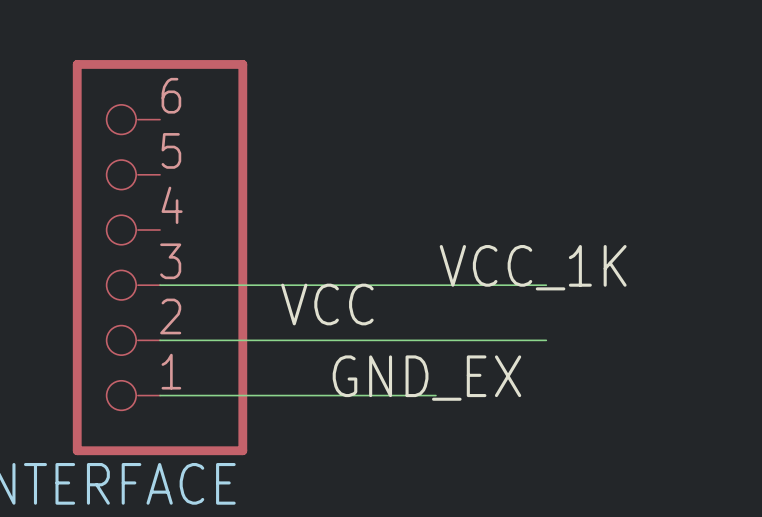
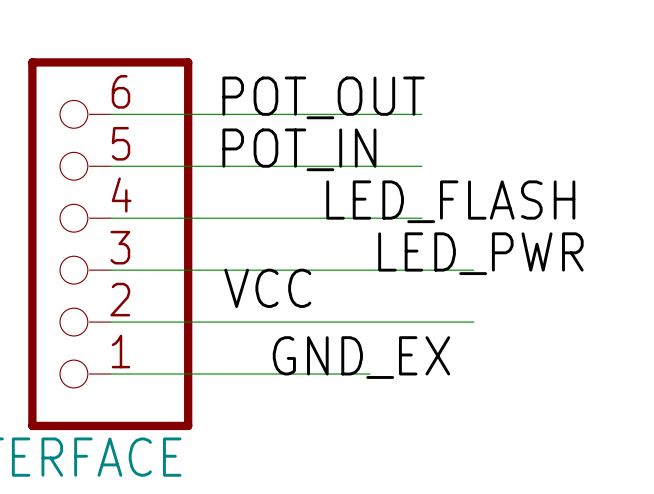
label: none -> POT_OUT (323, 97)
wire: none -> (110, 114) (421, 114)
label: none -> POT_IN (299, 149)
wire: none -> (110, 166) (421, 166)
label: none -> LED_FLASH (450, 201)
wire: none -> (110, 218) (421, 218)
label: VCC_1K (533, 267) -> LED_PWR (480, 253)

